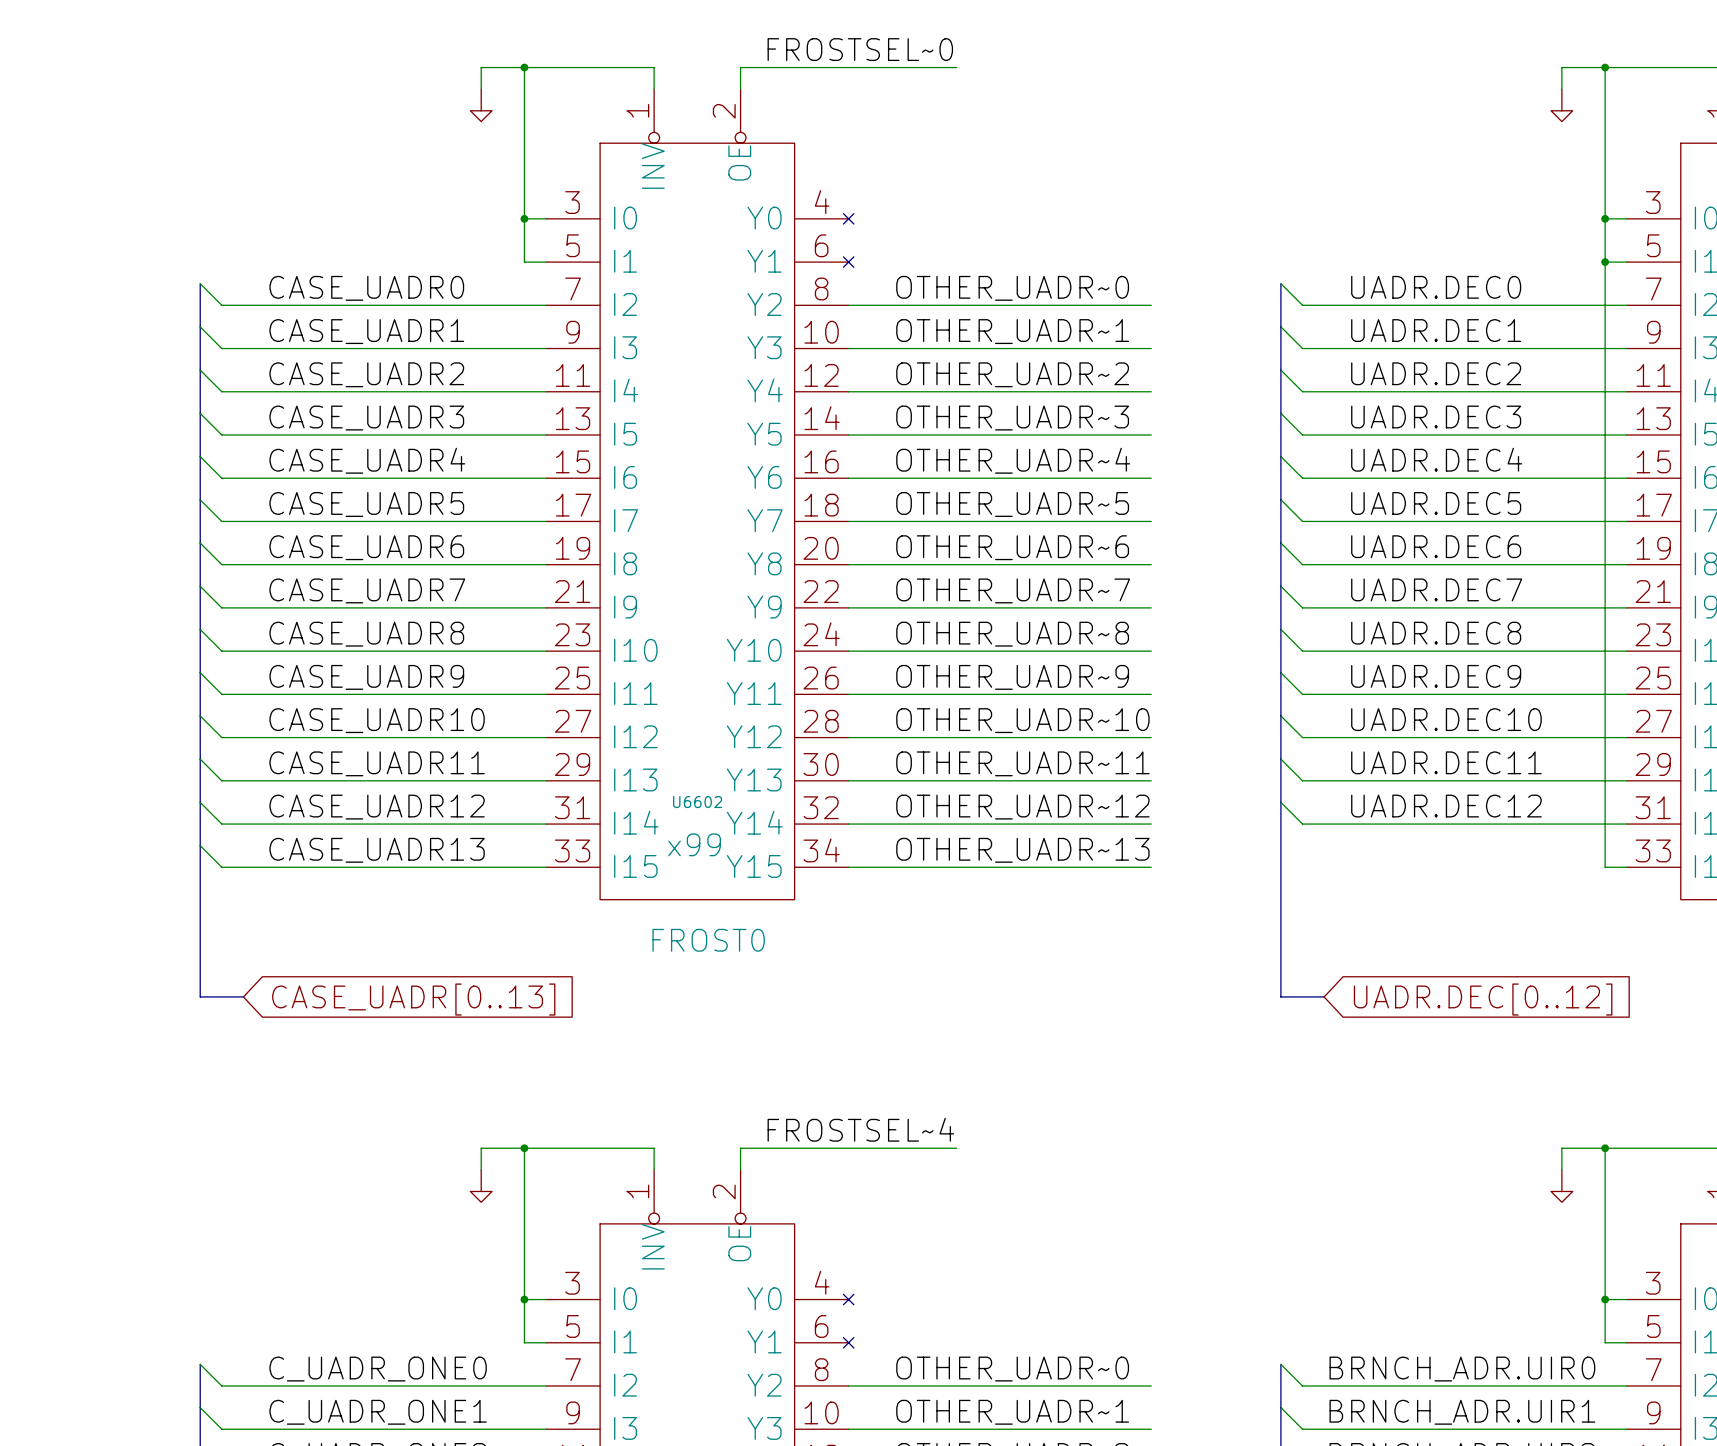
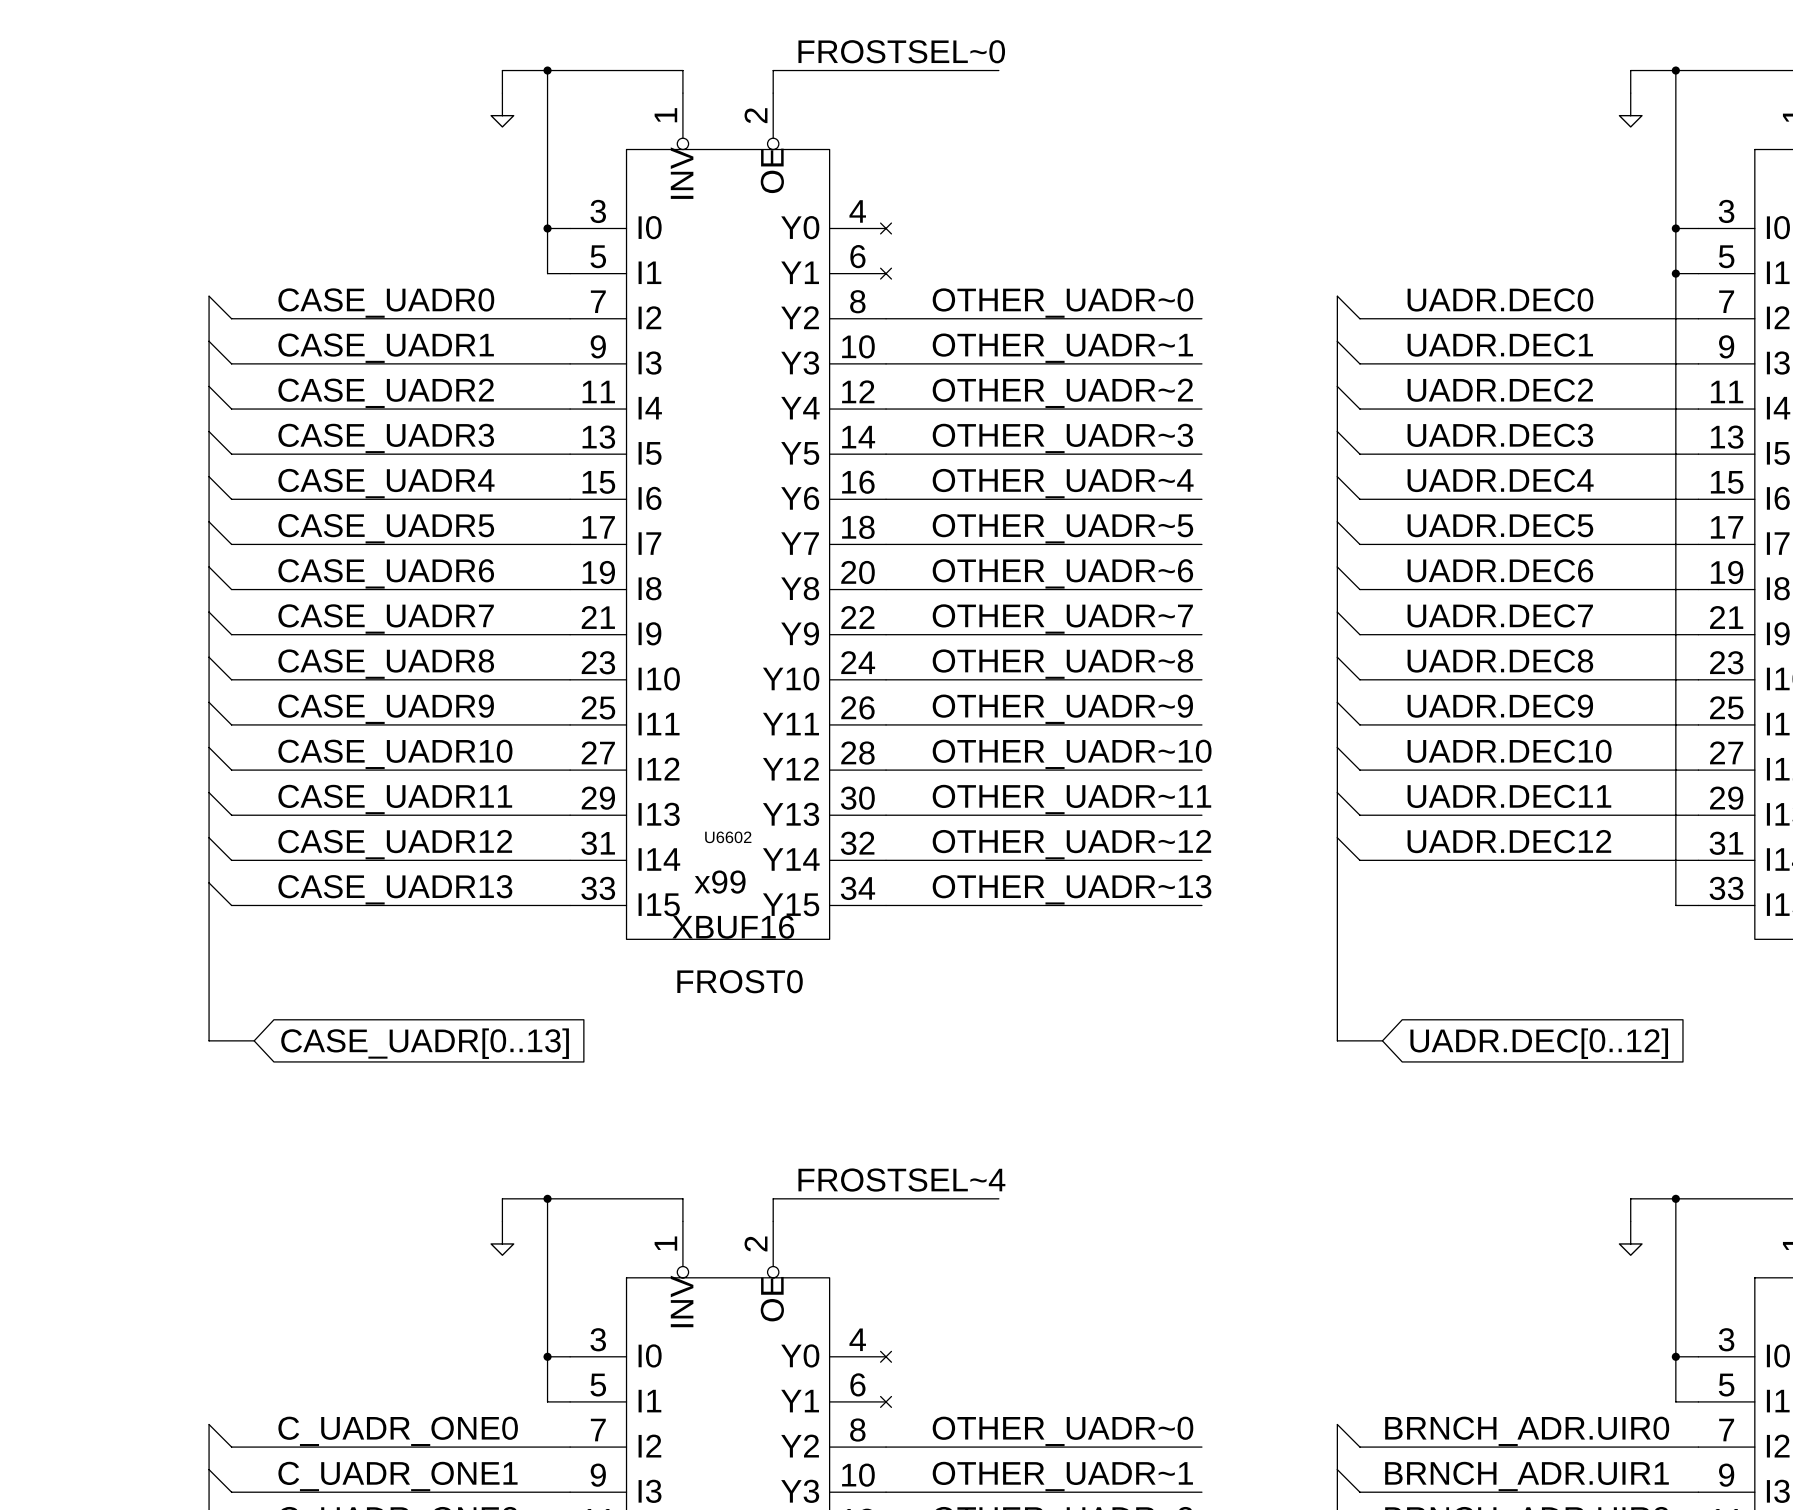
U6602 value: none -> XBUF16 (733, 927)

